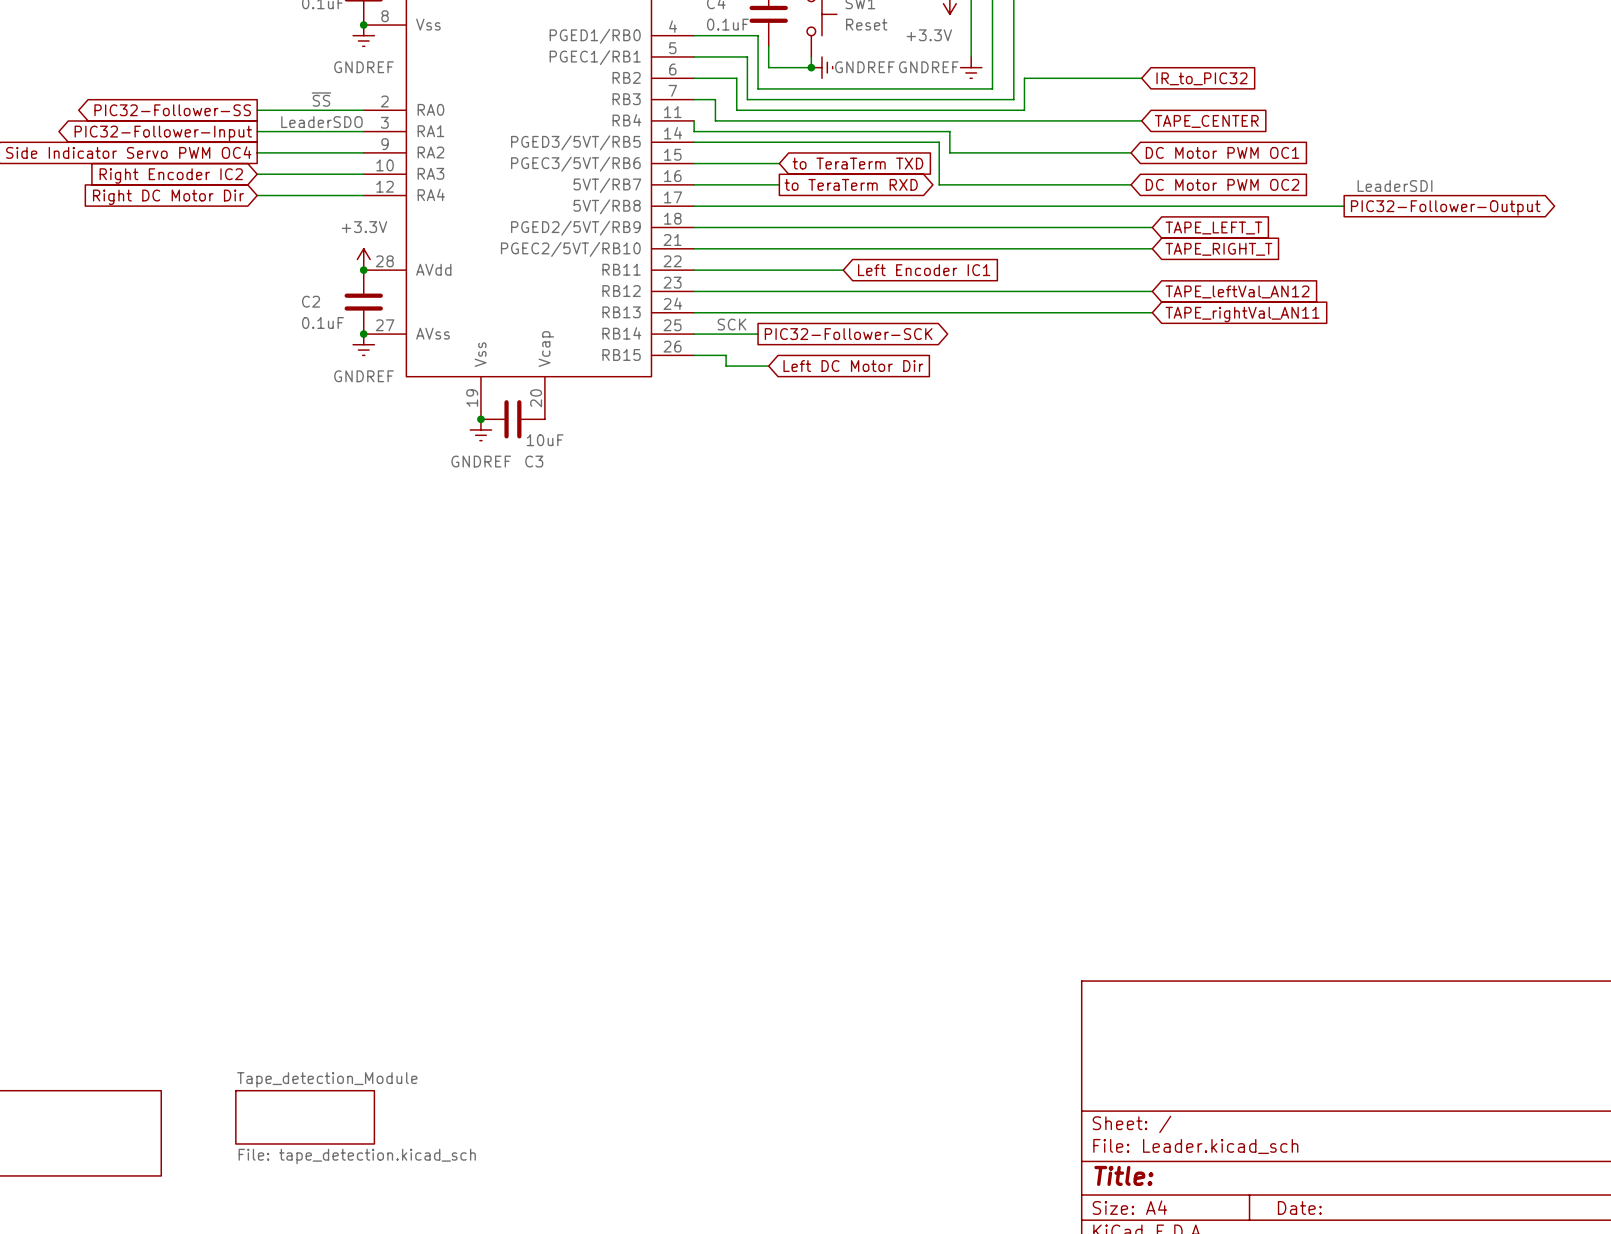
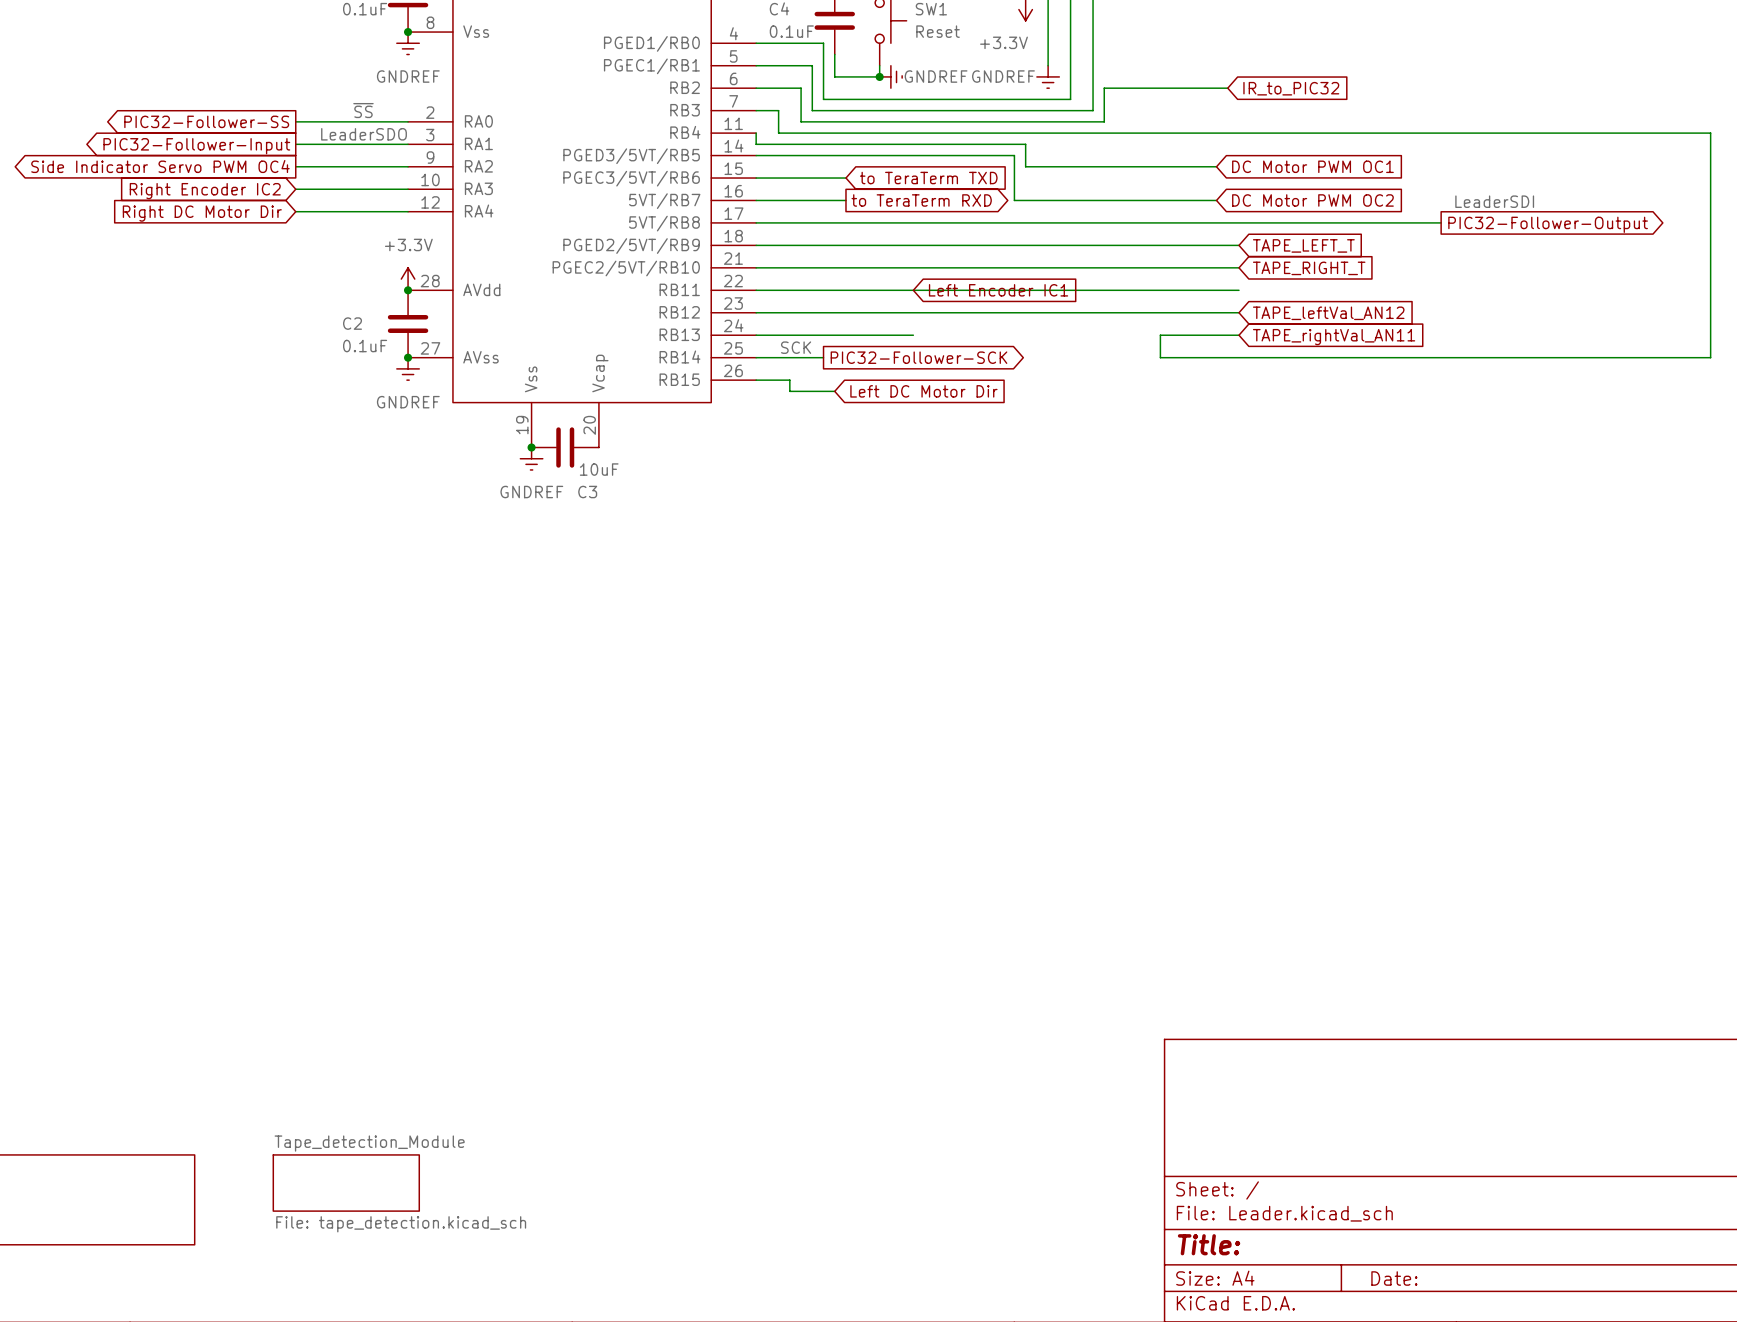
global label: TAPE_CENTER (1206, 121) -> none
wire: none -> (913, 290) (1239, 290)
wire: (843, 312) (1077, 312) -> (1227, 133) (1710, 133) (1710, 357) (1160, 357) (1160, 335)

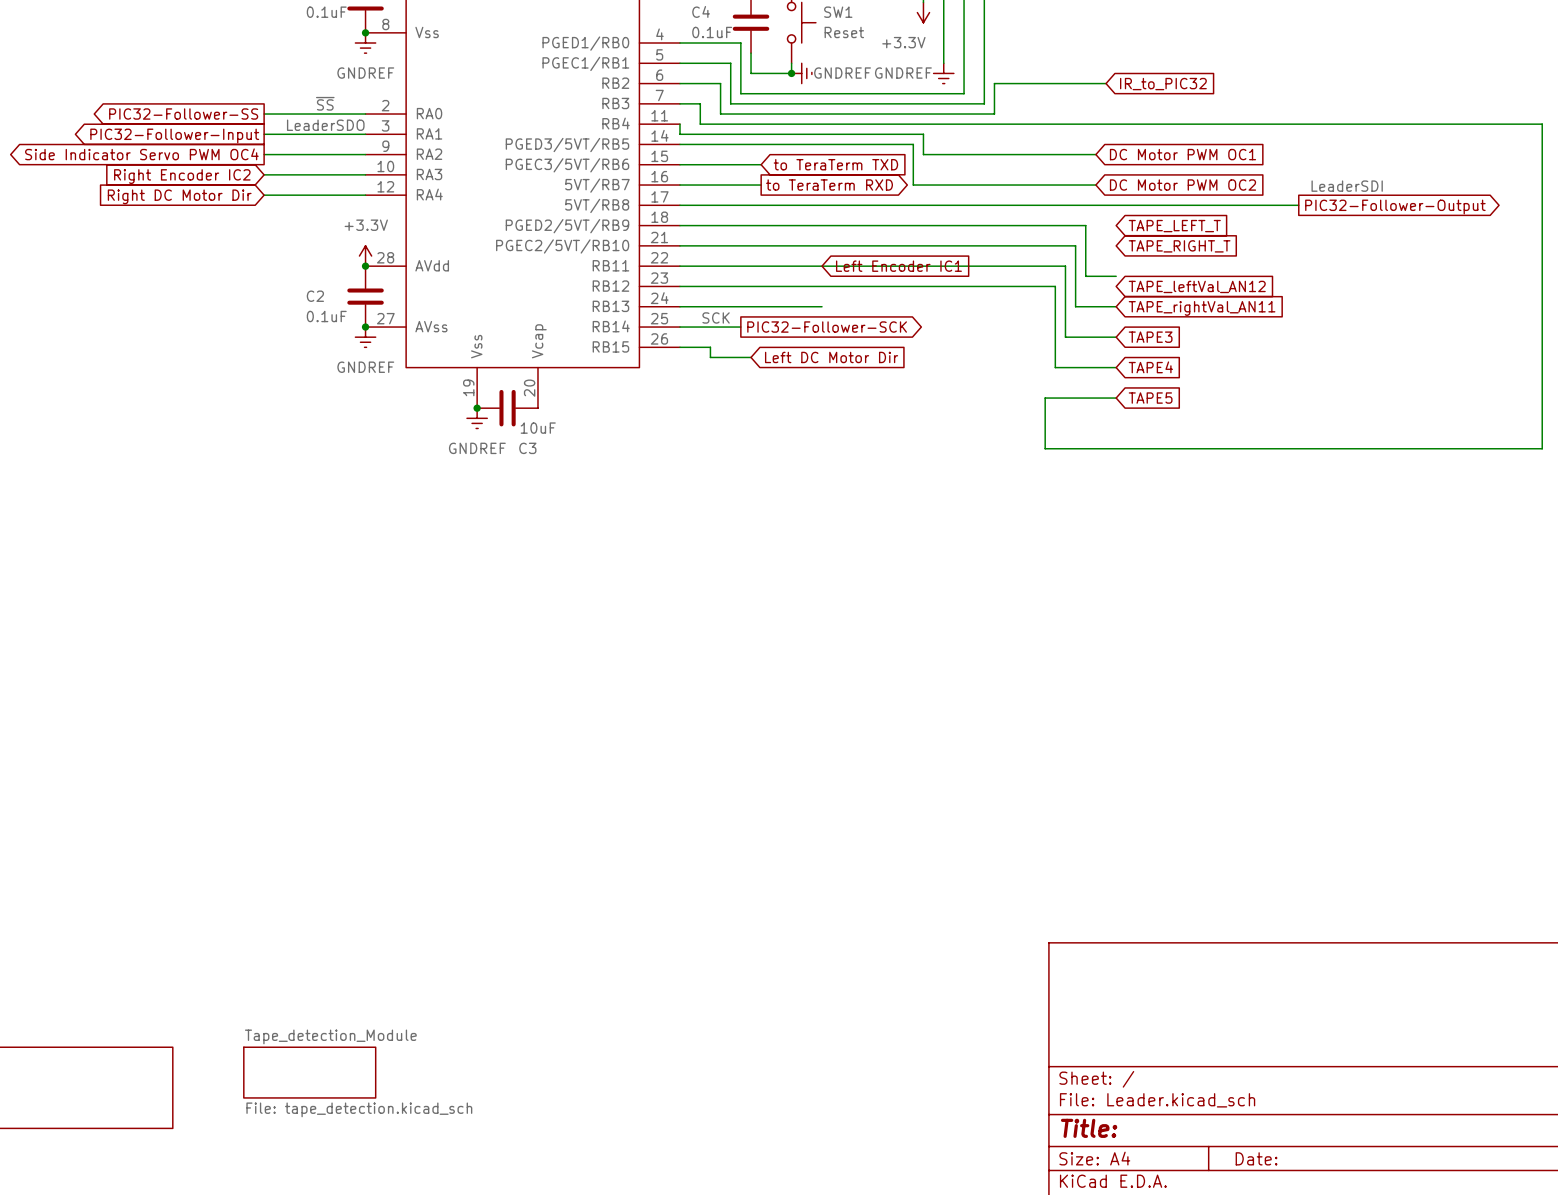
wire: (1205, 245) (1239, 245) -> (1085, 225) (1085, 276) (1116, 276)
wire: (1194, 267) (1239, 267) -> (1075, 245) (1075, 306)
wire: (1182, 290) (1239, 290) -> (1065, 266) (1065, 337) (1116, 337)
wire: (1171, 312) (1239, 312) -> (1055, 286) (1055, 367) (1116, 367)
wire: (1194, 335) (1160, 335) (1160, 357) (1710, 357) -> (1116, 398) (1045, 398) (1045, 448) (1542, 448) (1542, 327)
global label: none -> TAPE3 (1150, 337)
global label: none -> TAPE4 (1150, 367)
global label: none -> TAPE5 (1150, 398)

